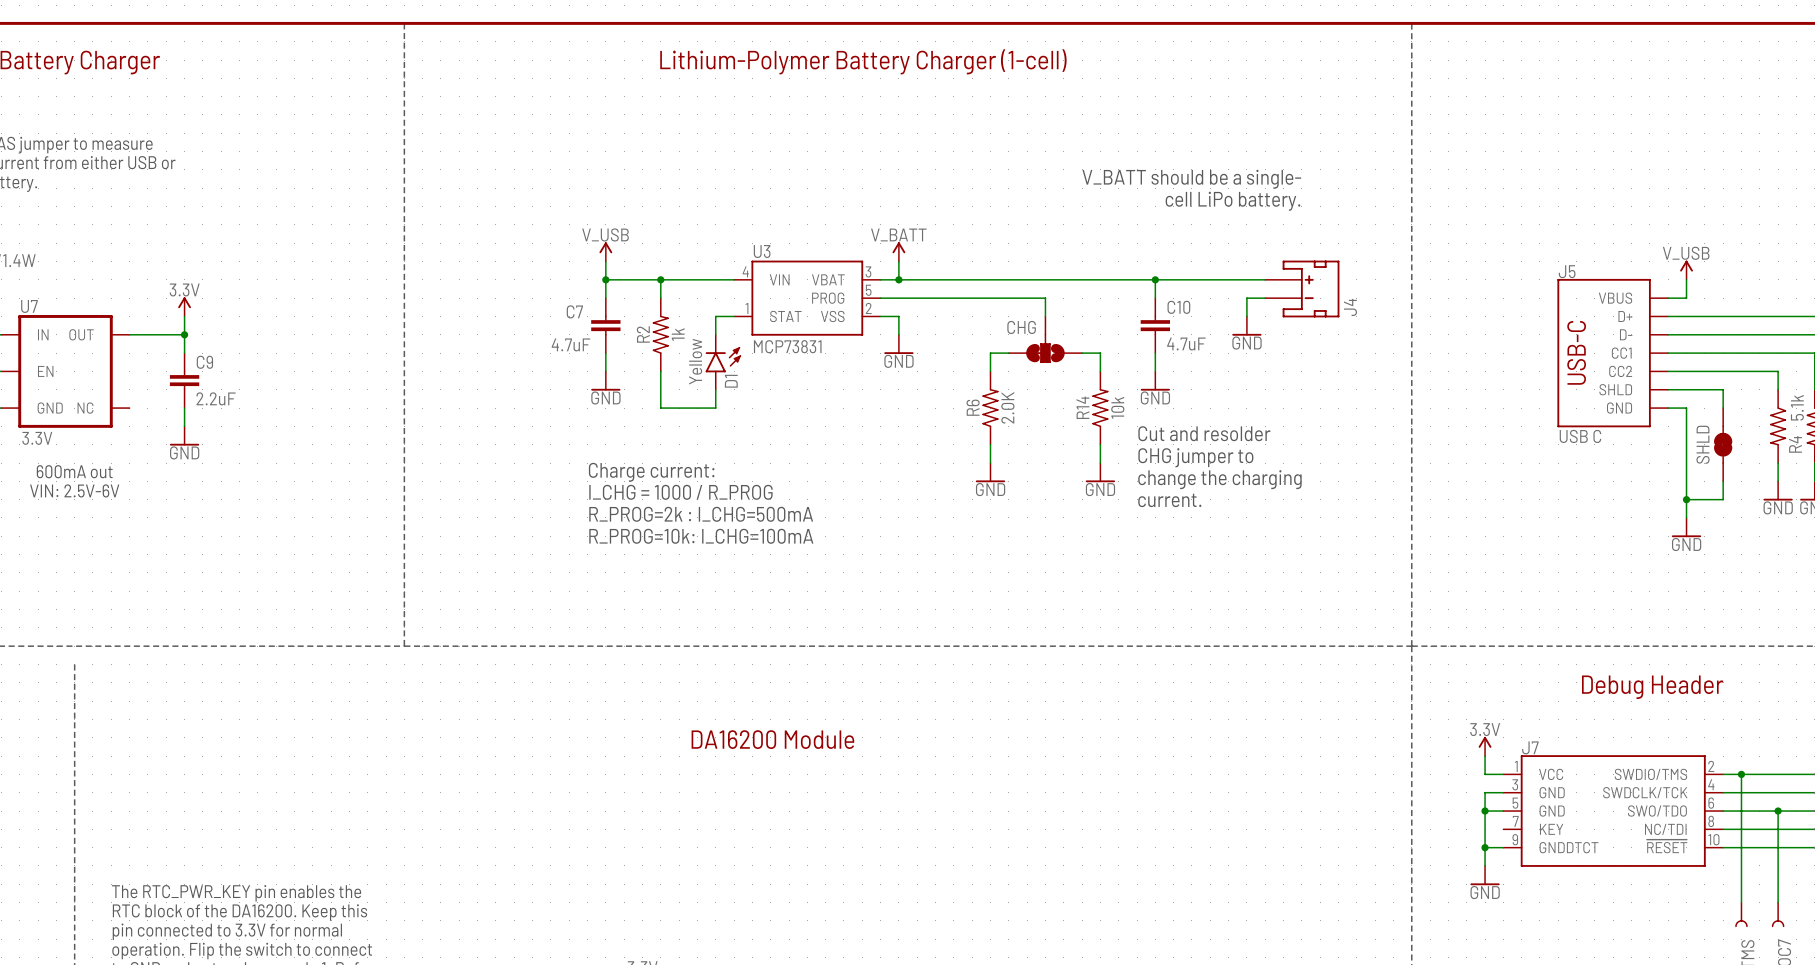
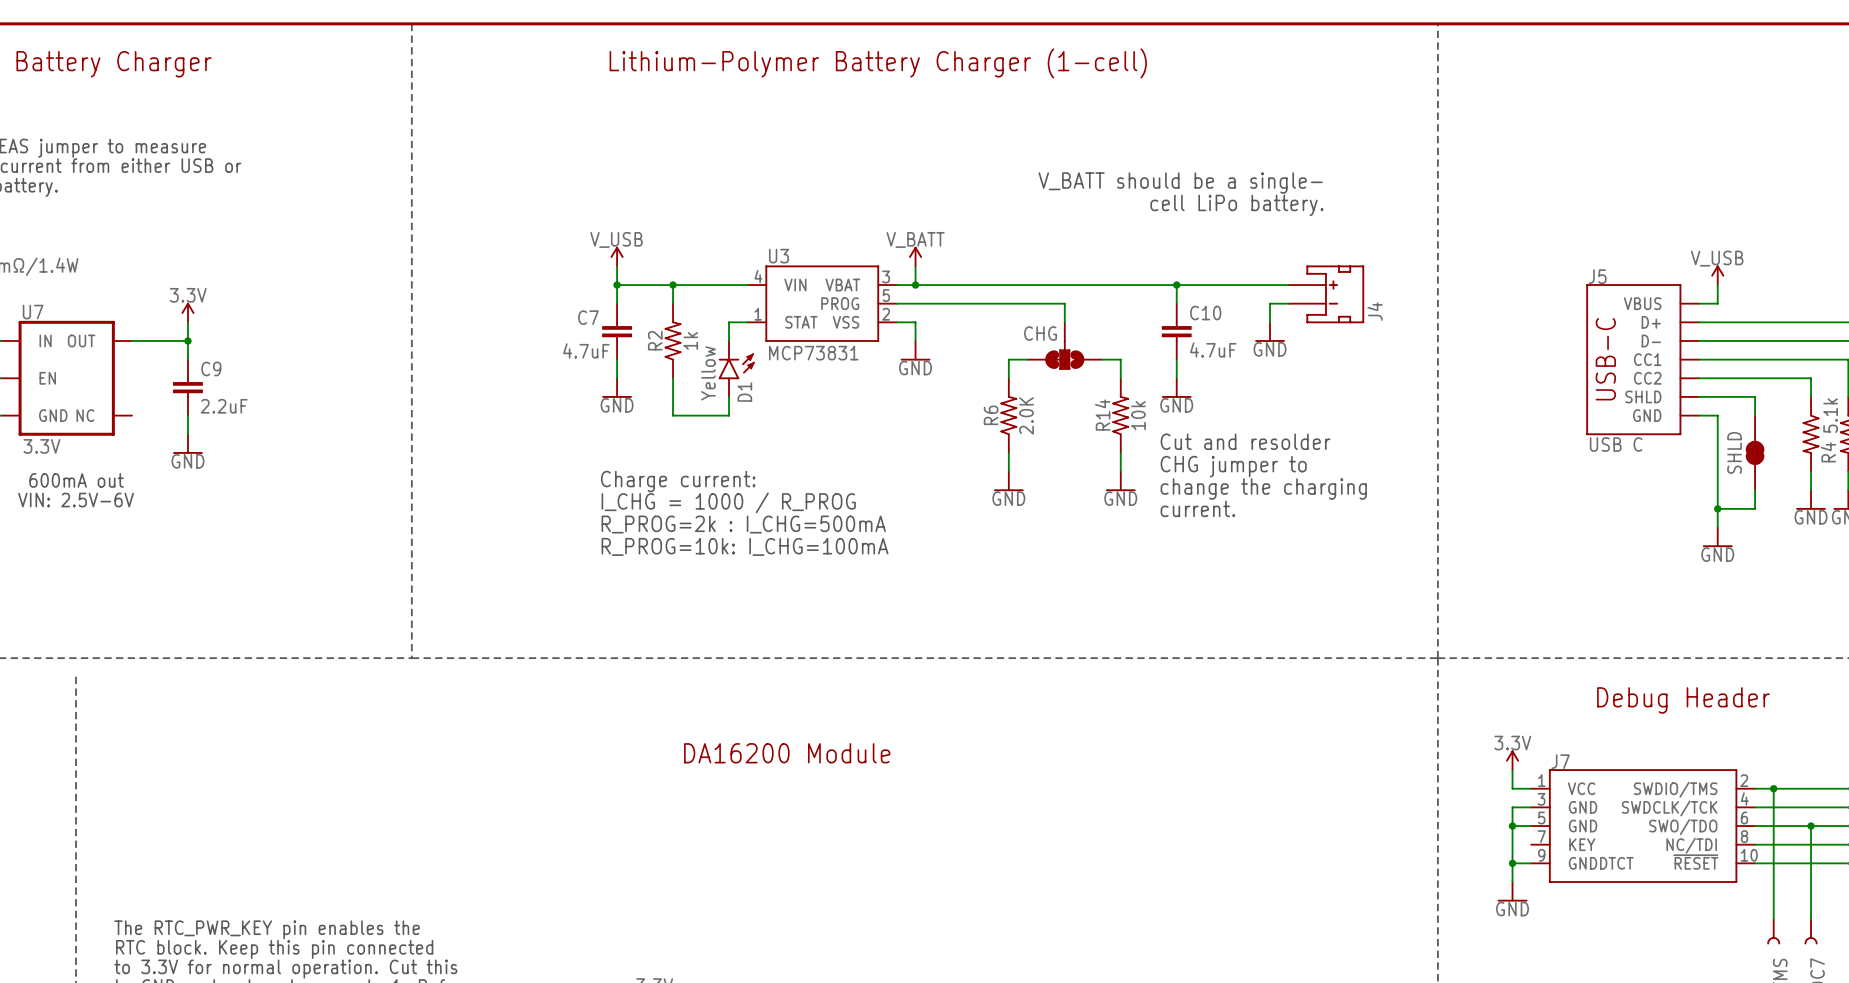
text: The RTC_PWR_KEY pin enables the (236, 893) -> none
text: RTC block of the DA16200. Keep this (239, 912) -> The RTC_PWR_KEY pin enables the (267, 929)
text: pin connected to 3.3V for normal (227, 931) -> RTC block. Keep this pin connected (274, 949)
text: operation. Flip the switch to connect (242, 951) -> to 3.3V for normal operation. Cut this (285, 969)

